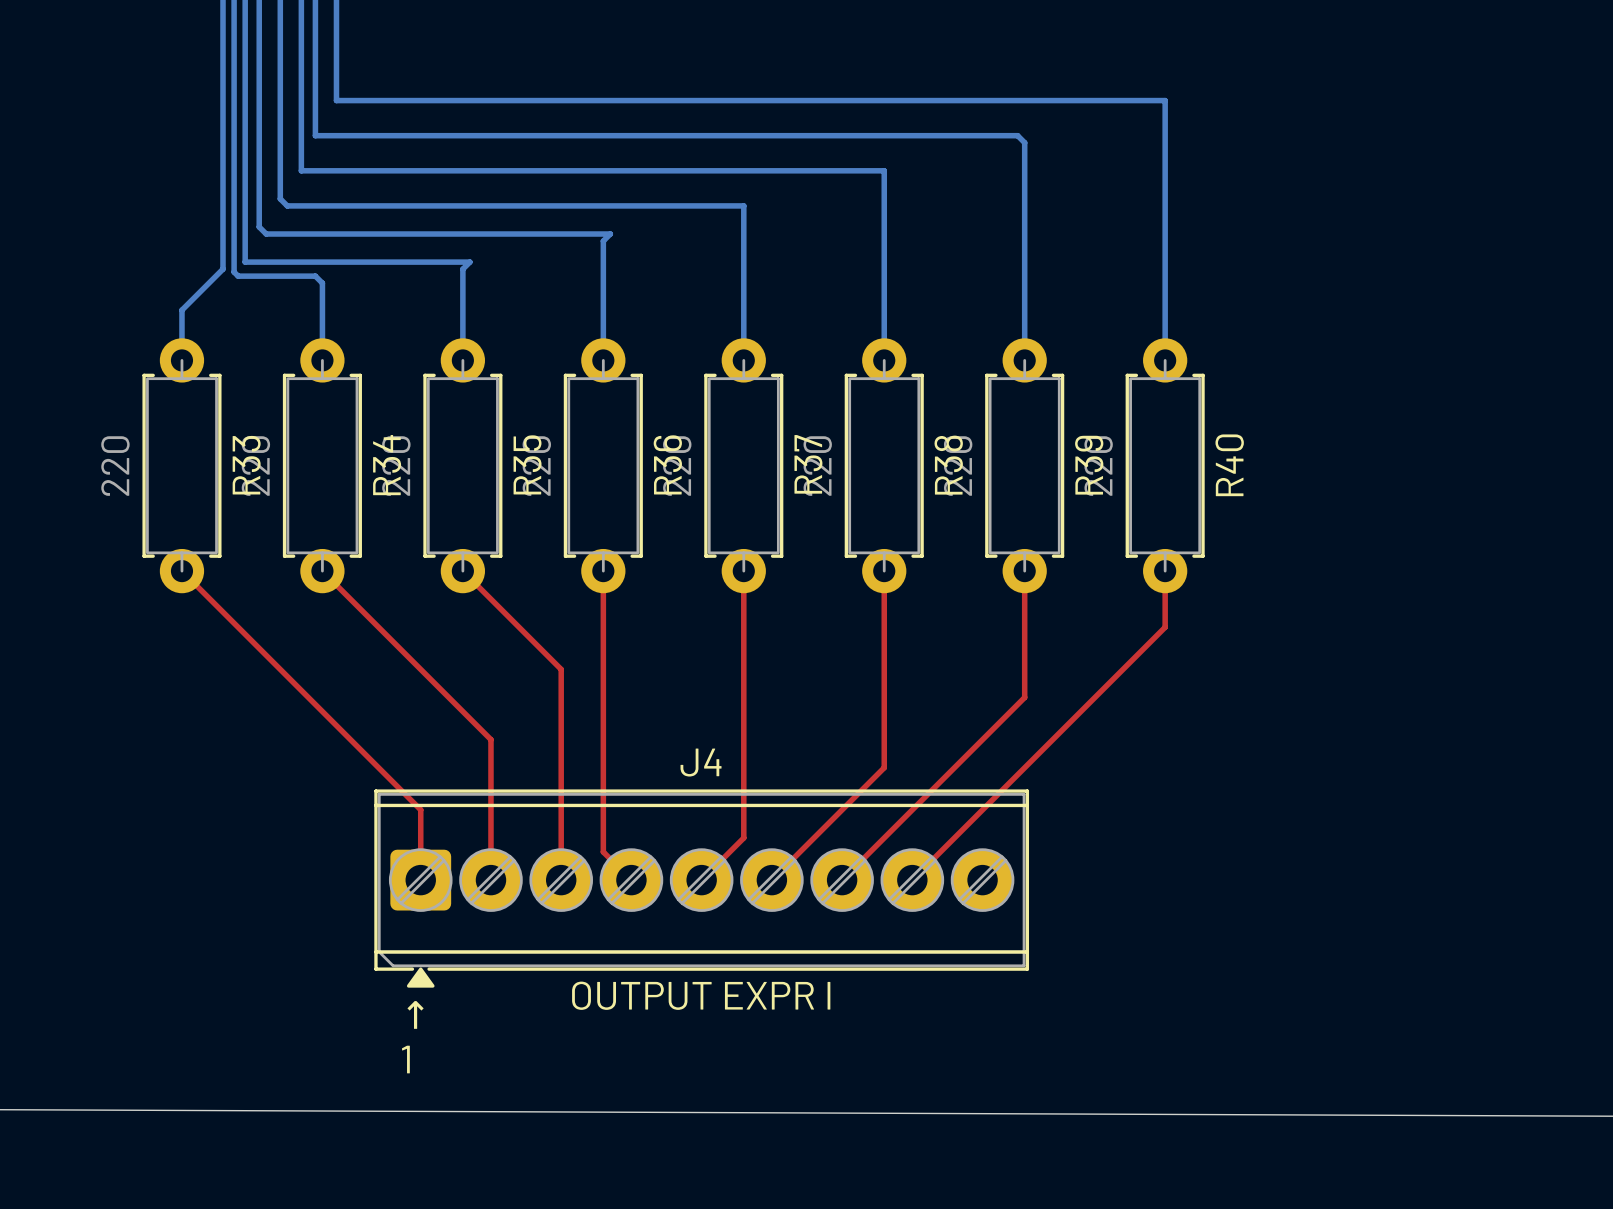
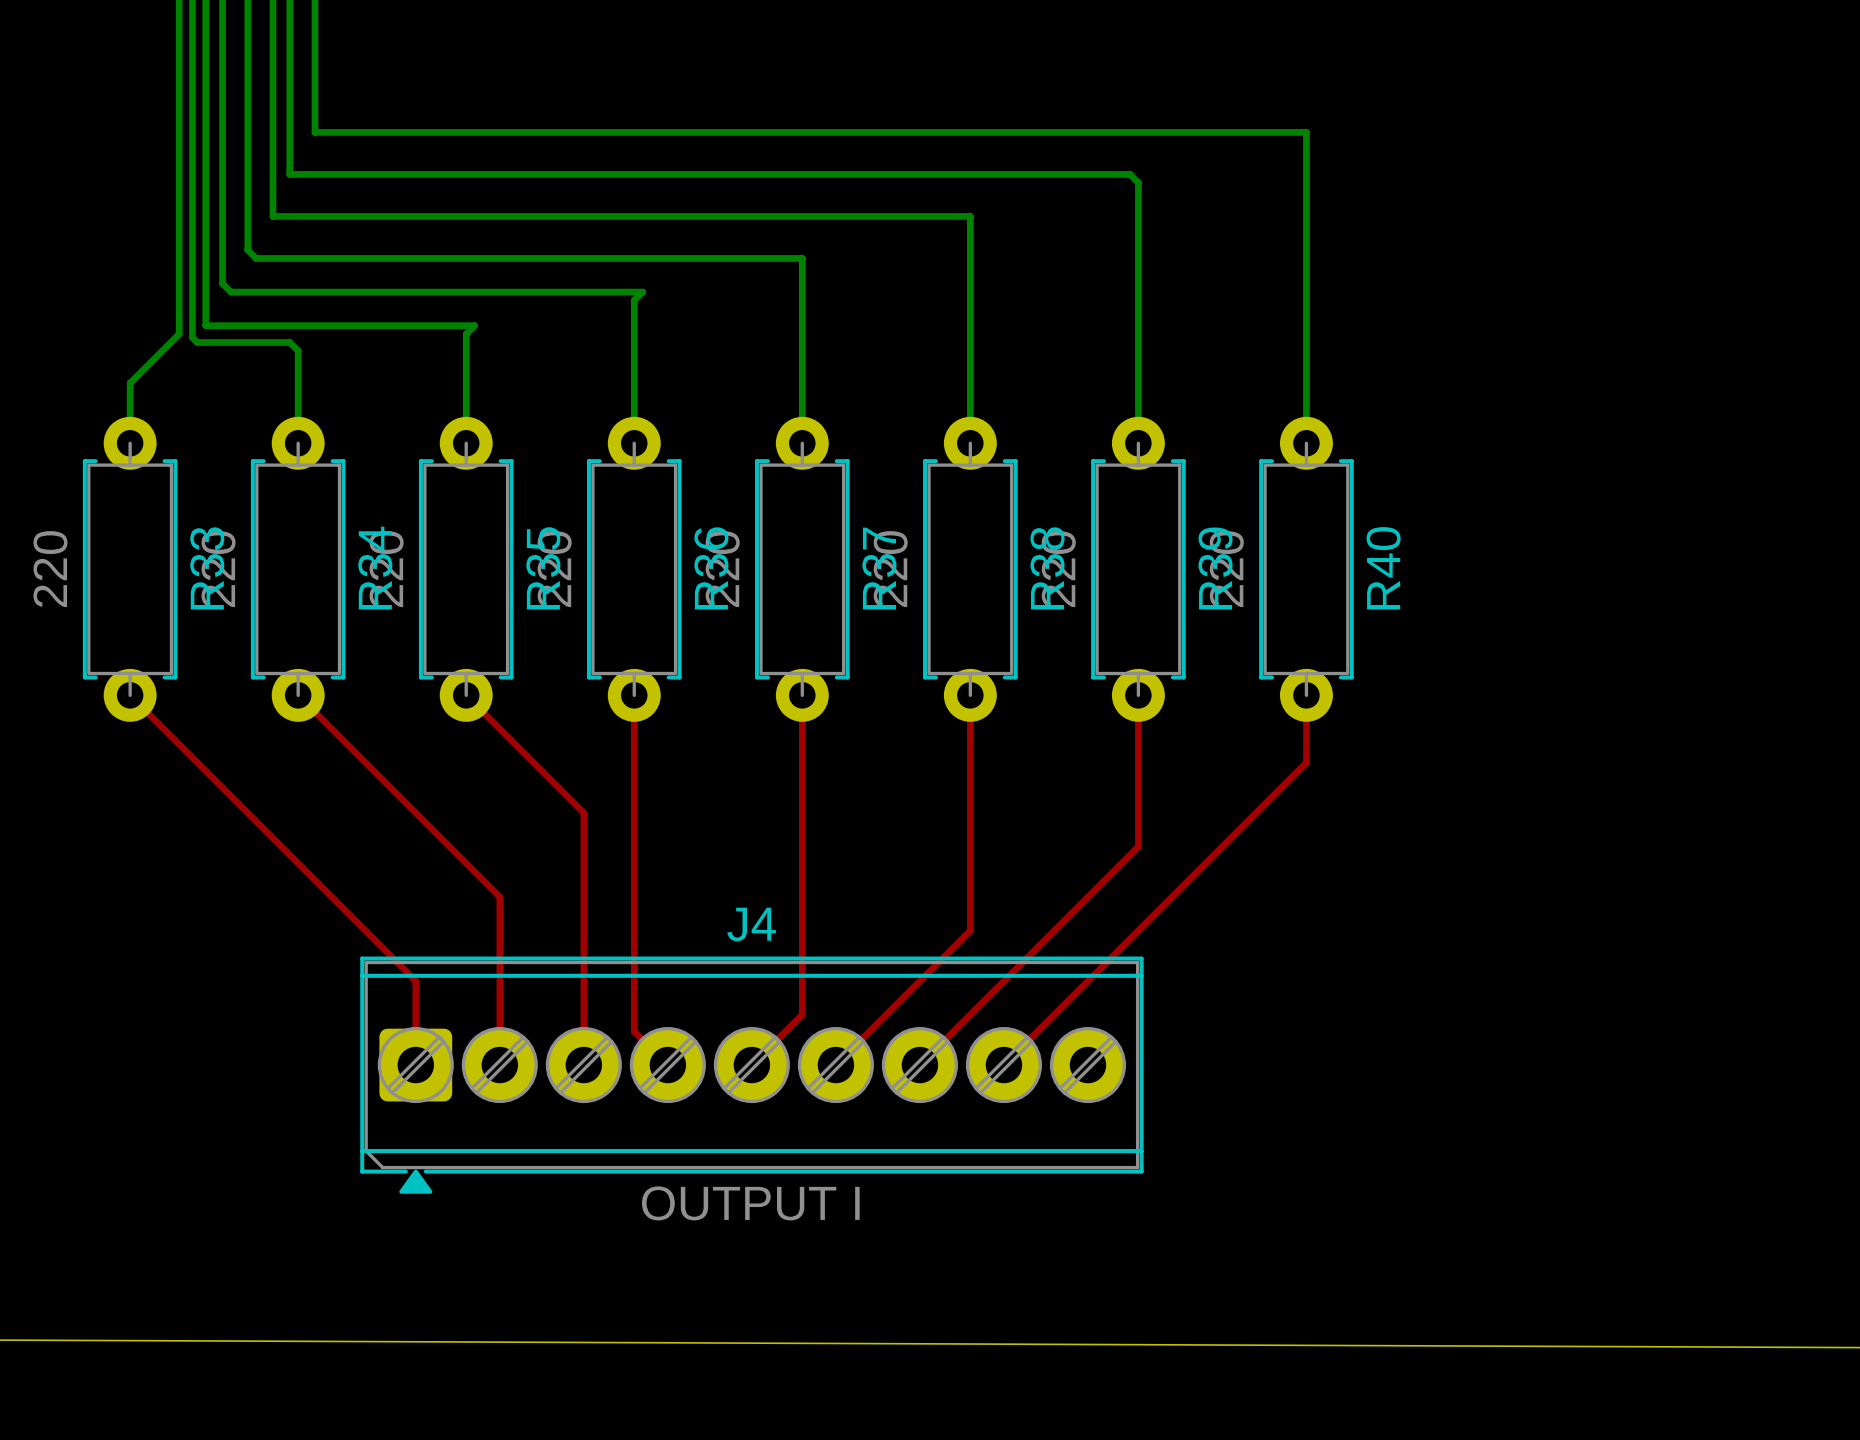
J4 value: OUTPUT EXPR I (701, 995) -> OUTPUT I (750, 1203)
text: ↑ (415, 1014) -> none
text: 1 (405, 1059) -> none

